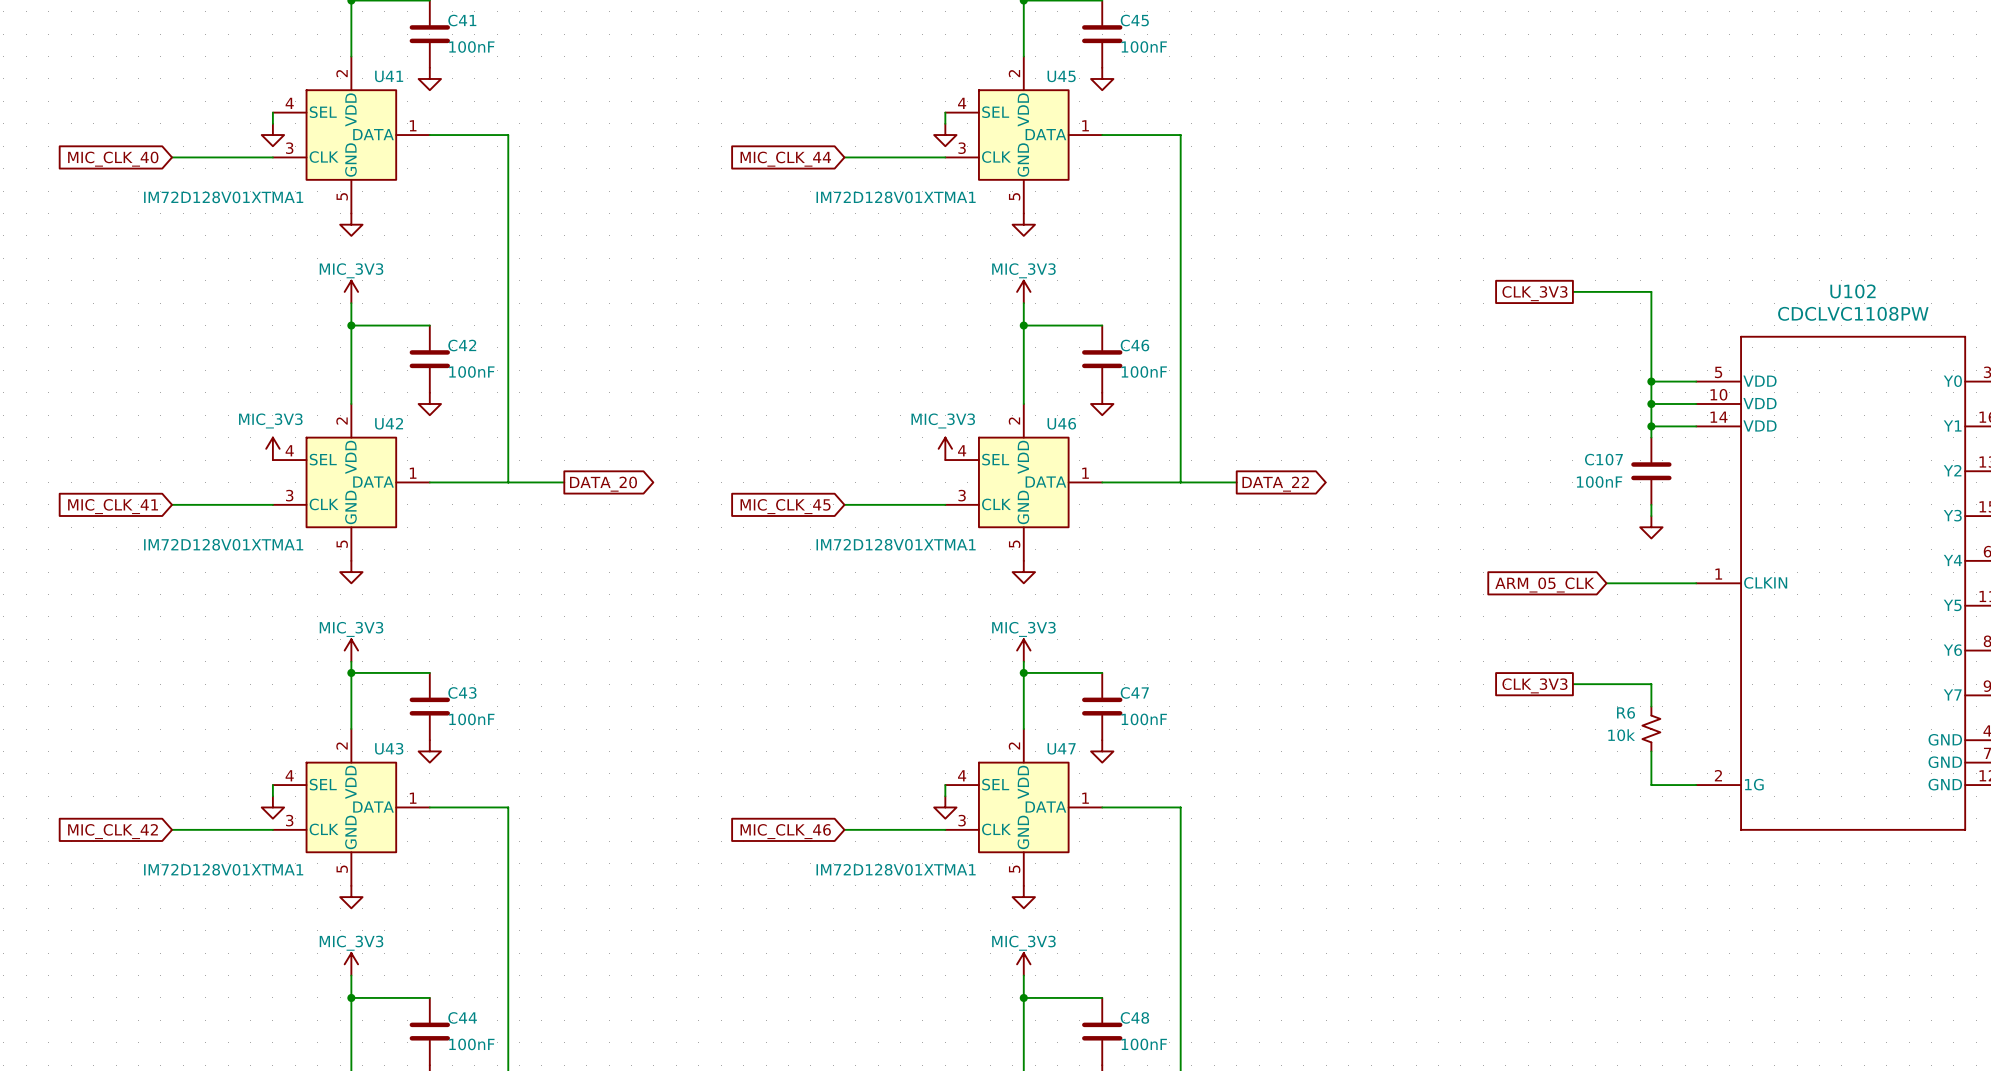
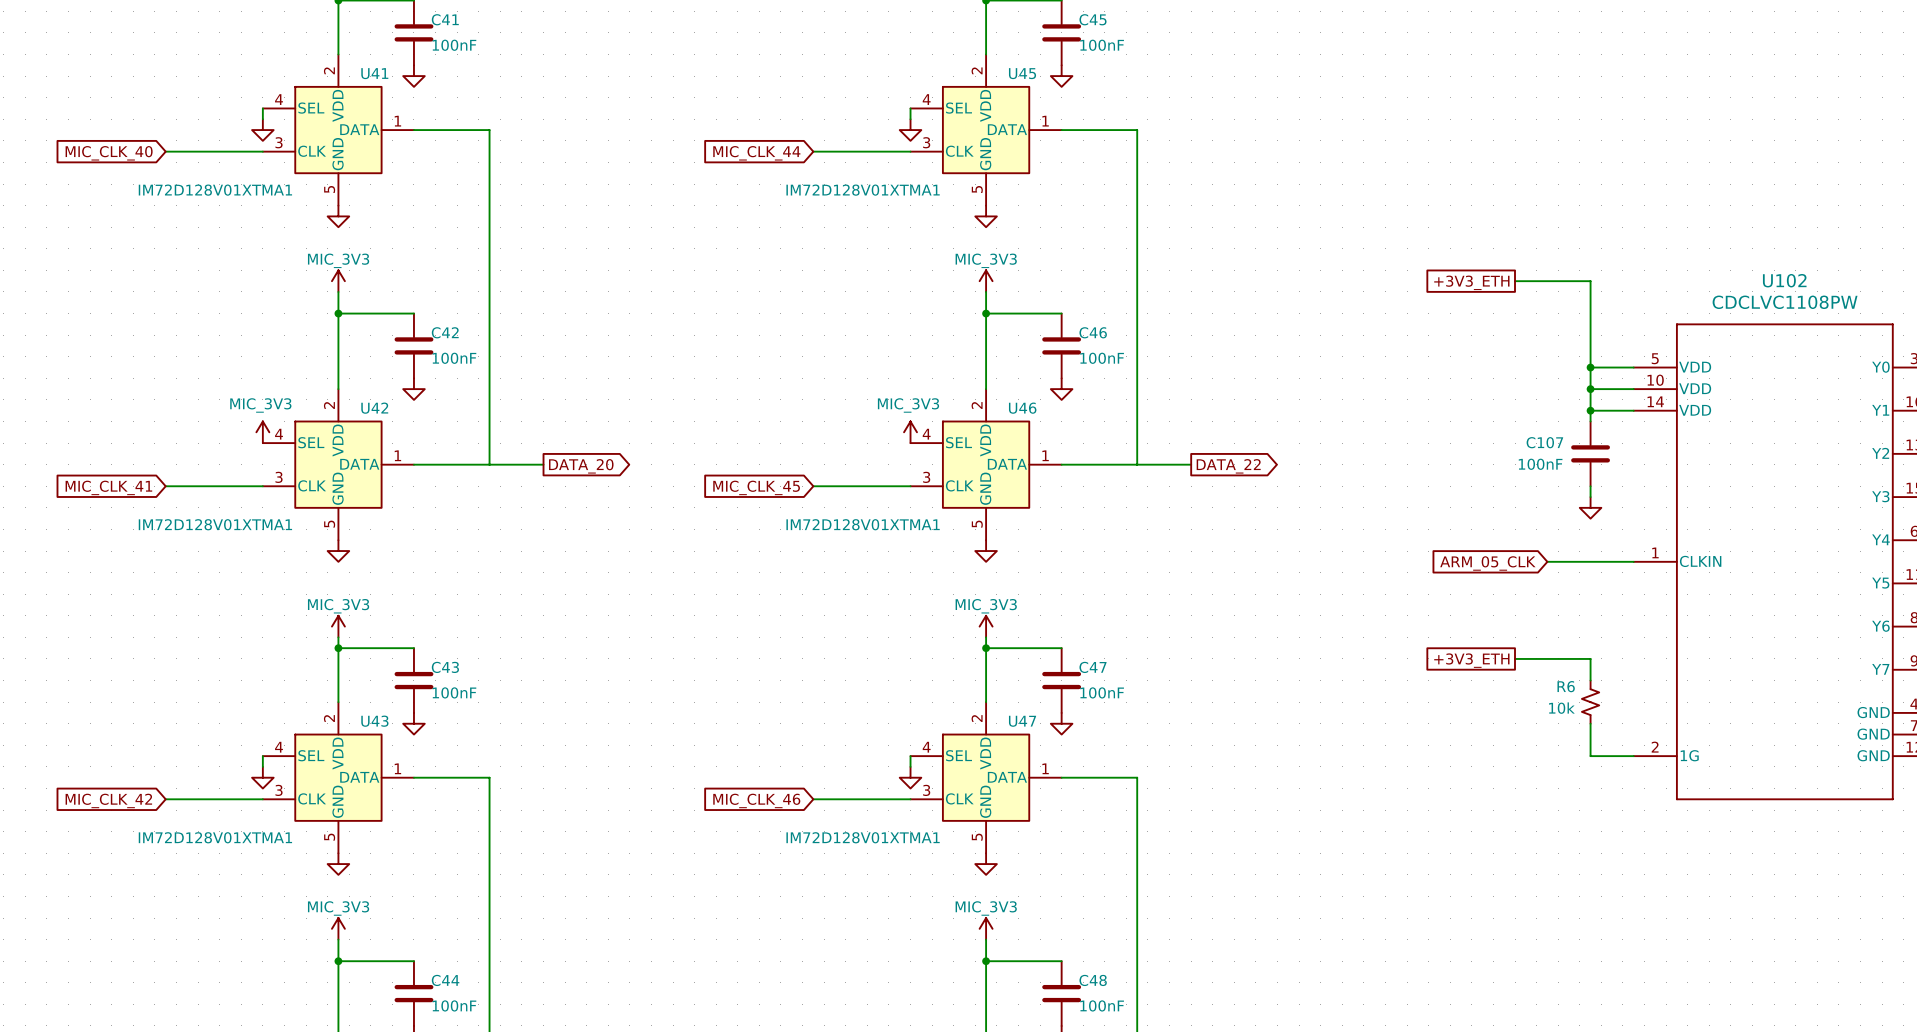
global label: CLK_3V3 (1534, 293) -> +3V3_ETH (1471, 282)
global label: CLK_3V3 (1534, 685) -> +3V3_ETH (1471, 660)

